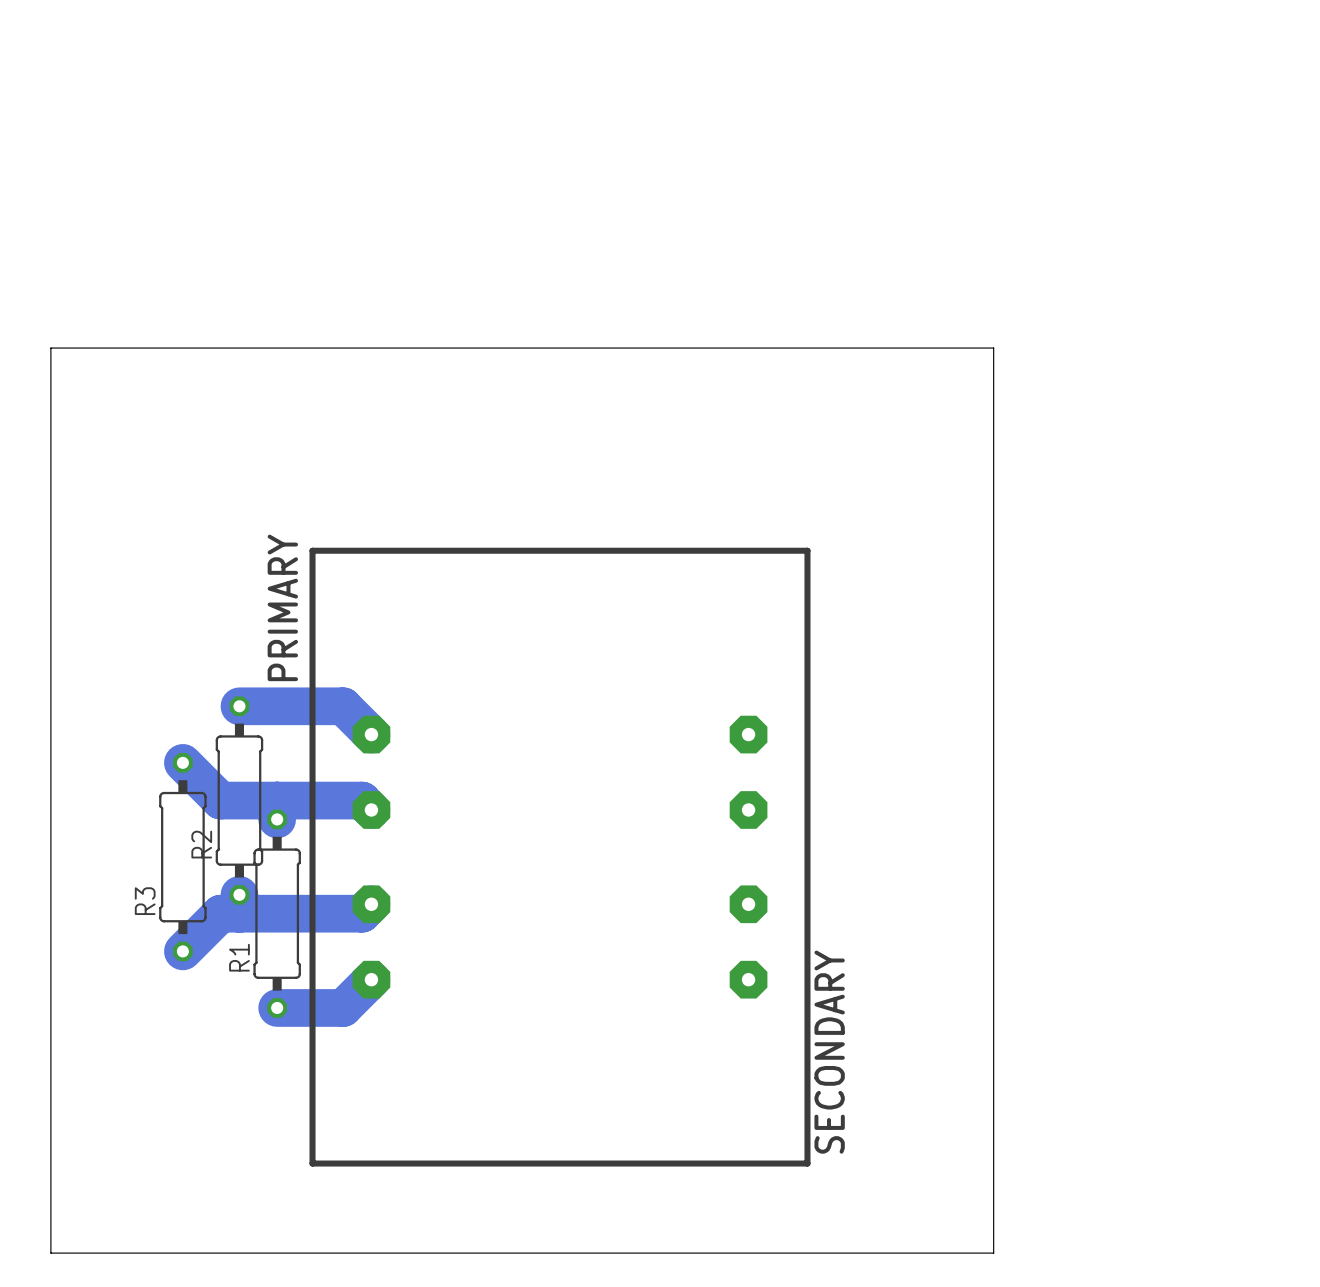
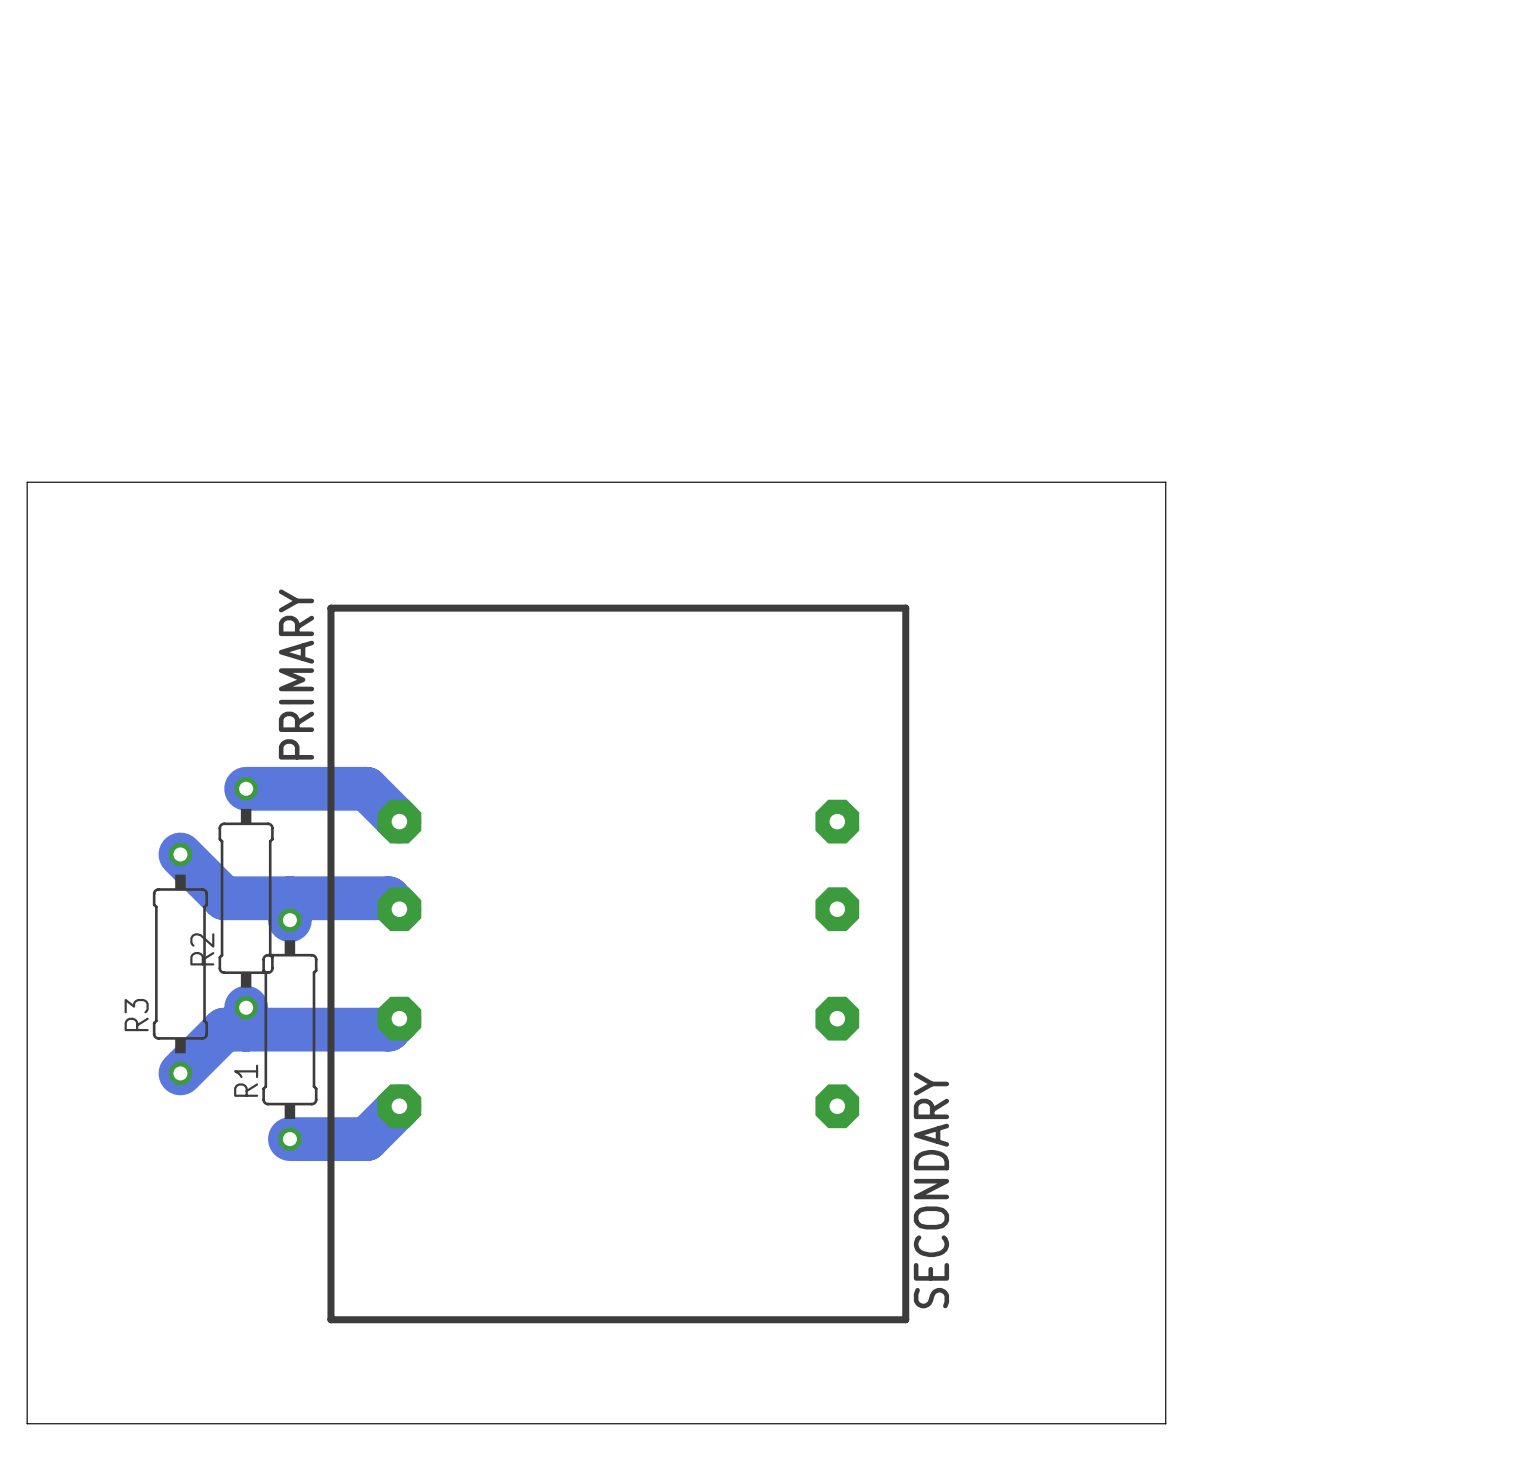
board edge: (50, 442) (50, 348) (993, 348) (993, 1253) -> (27, 482) (1165, 482) (1165, 1423) (1121, 1423)

